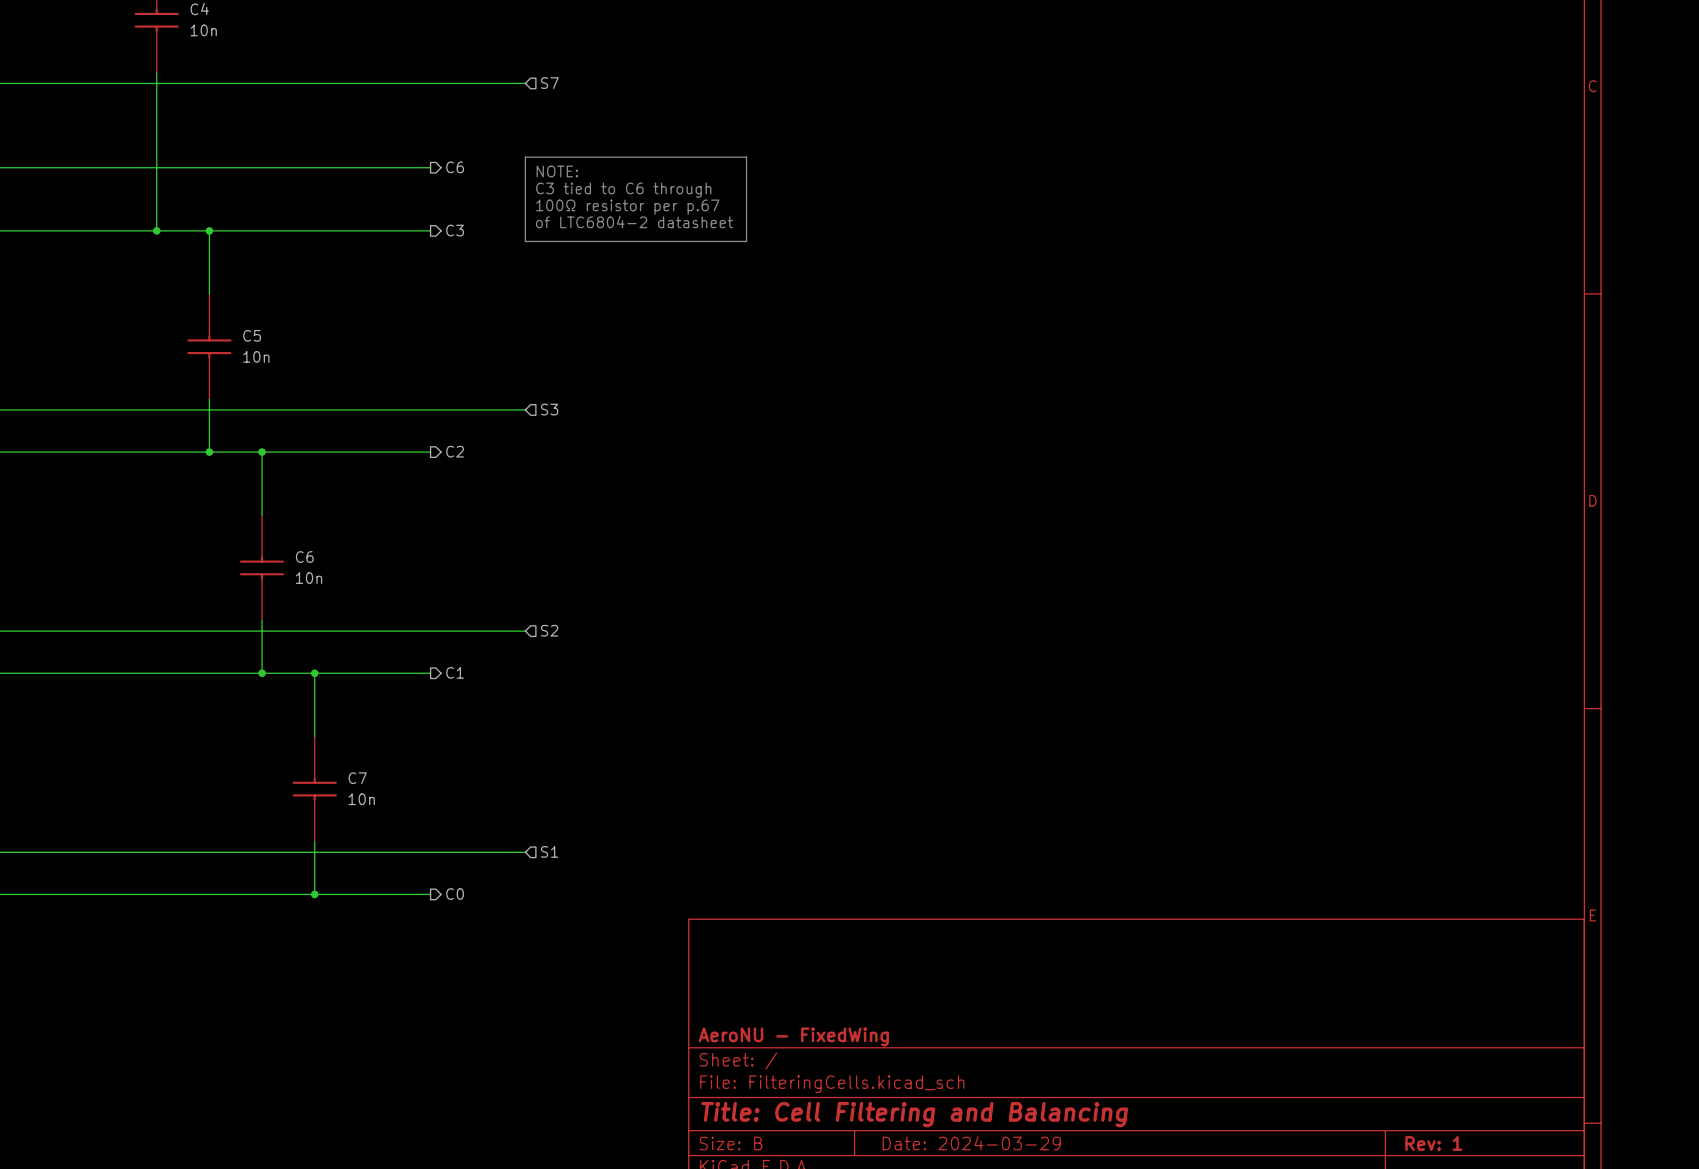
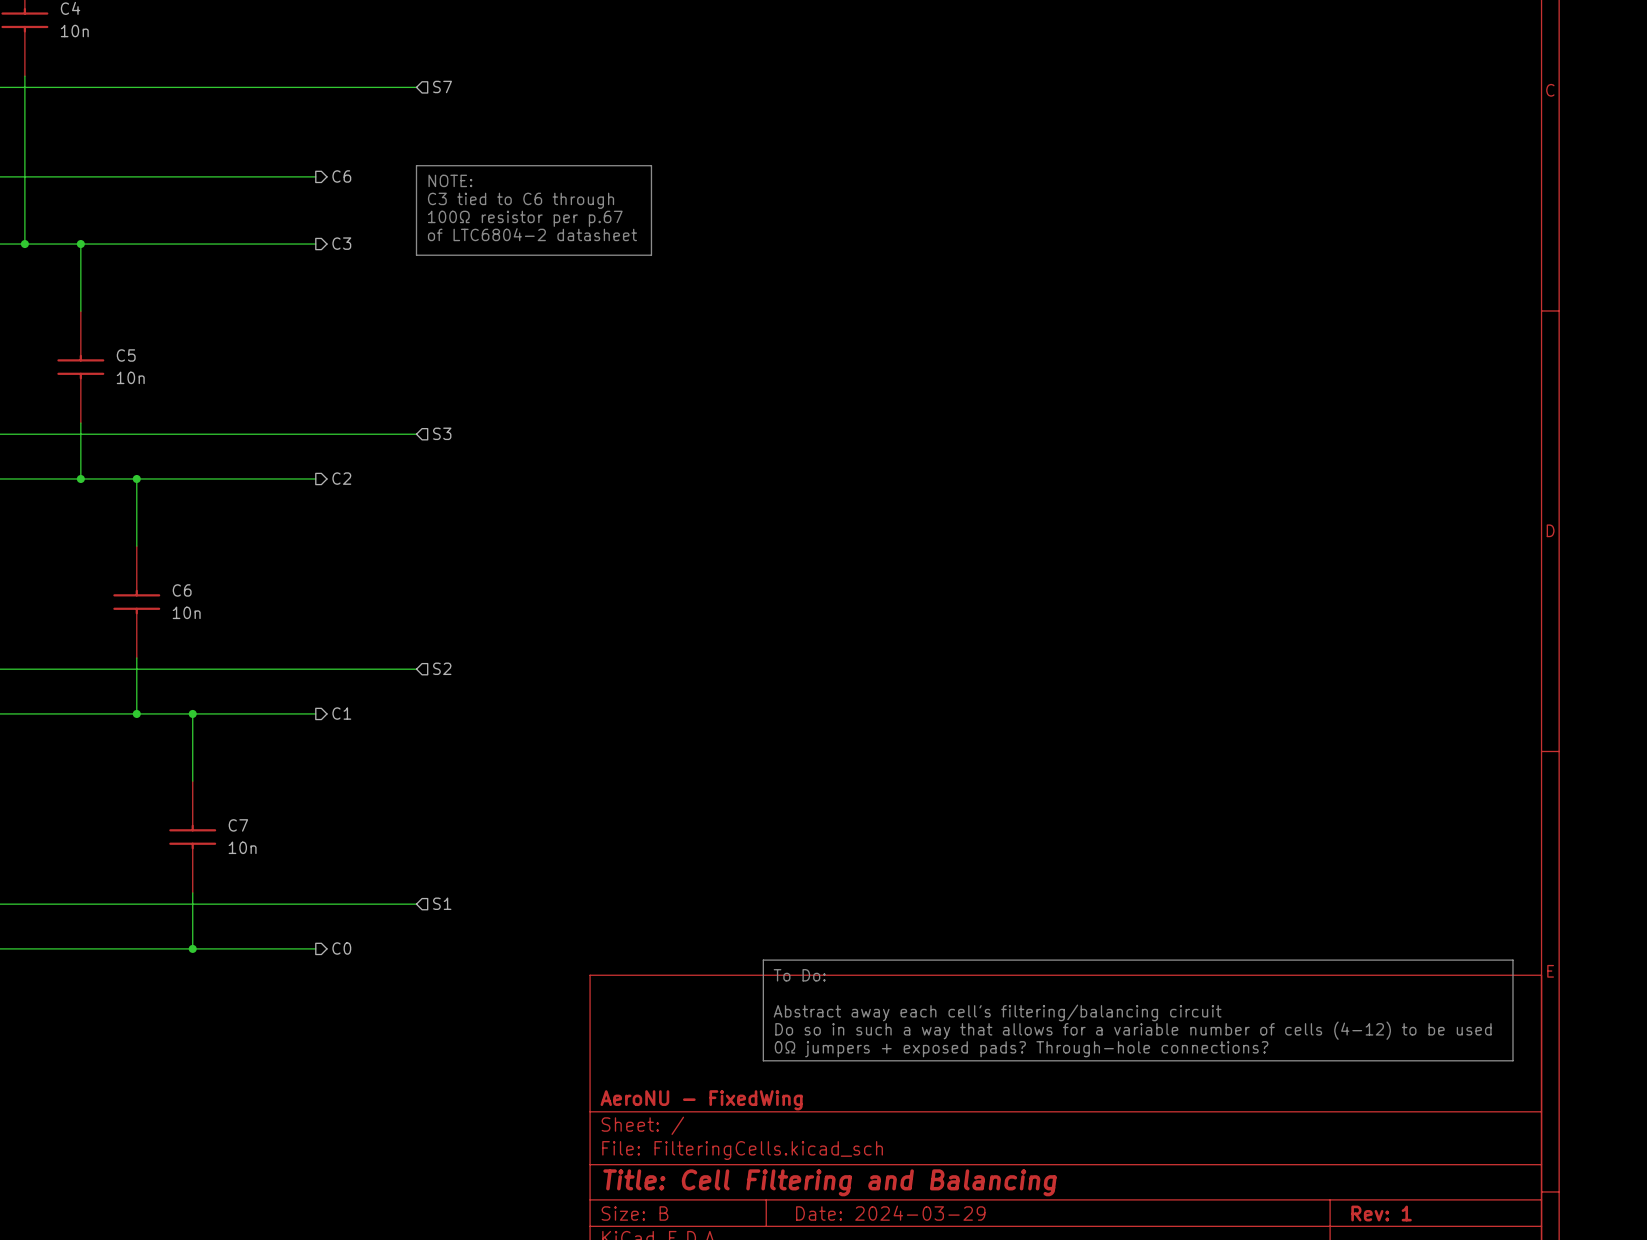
line: none -> (763, 960) (1512, 960) (1512, 1060) (763, 1060) (763, 960)
text: none -> To Do: (799, 975)
text: none -> Abstract away each cell's filtering/balancing circuit (997, 1012)
text: none -> Do so in such a way that allows for a variable number of cells (4-12) to be used (1133, 1030)
text: none -> 0Ω jumpers + exposed pads? Through-hole connections? (1021, 1049)

